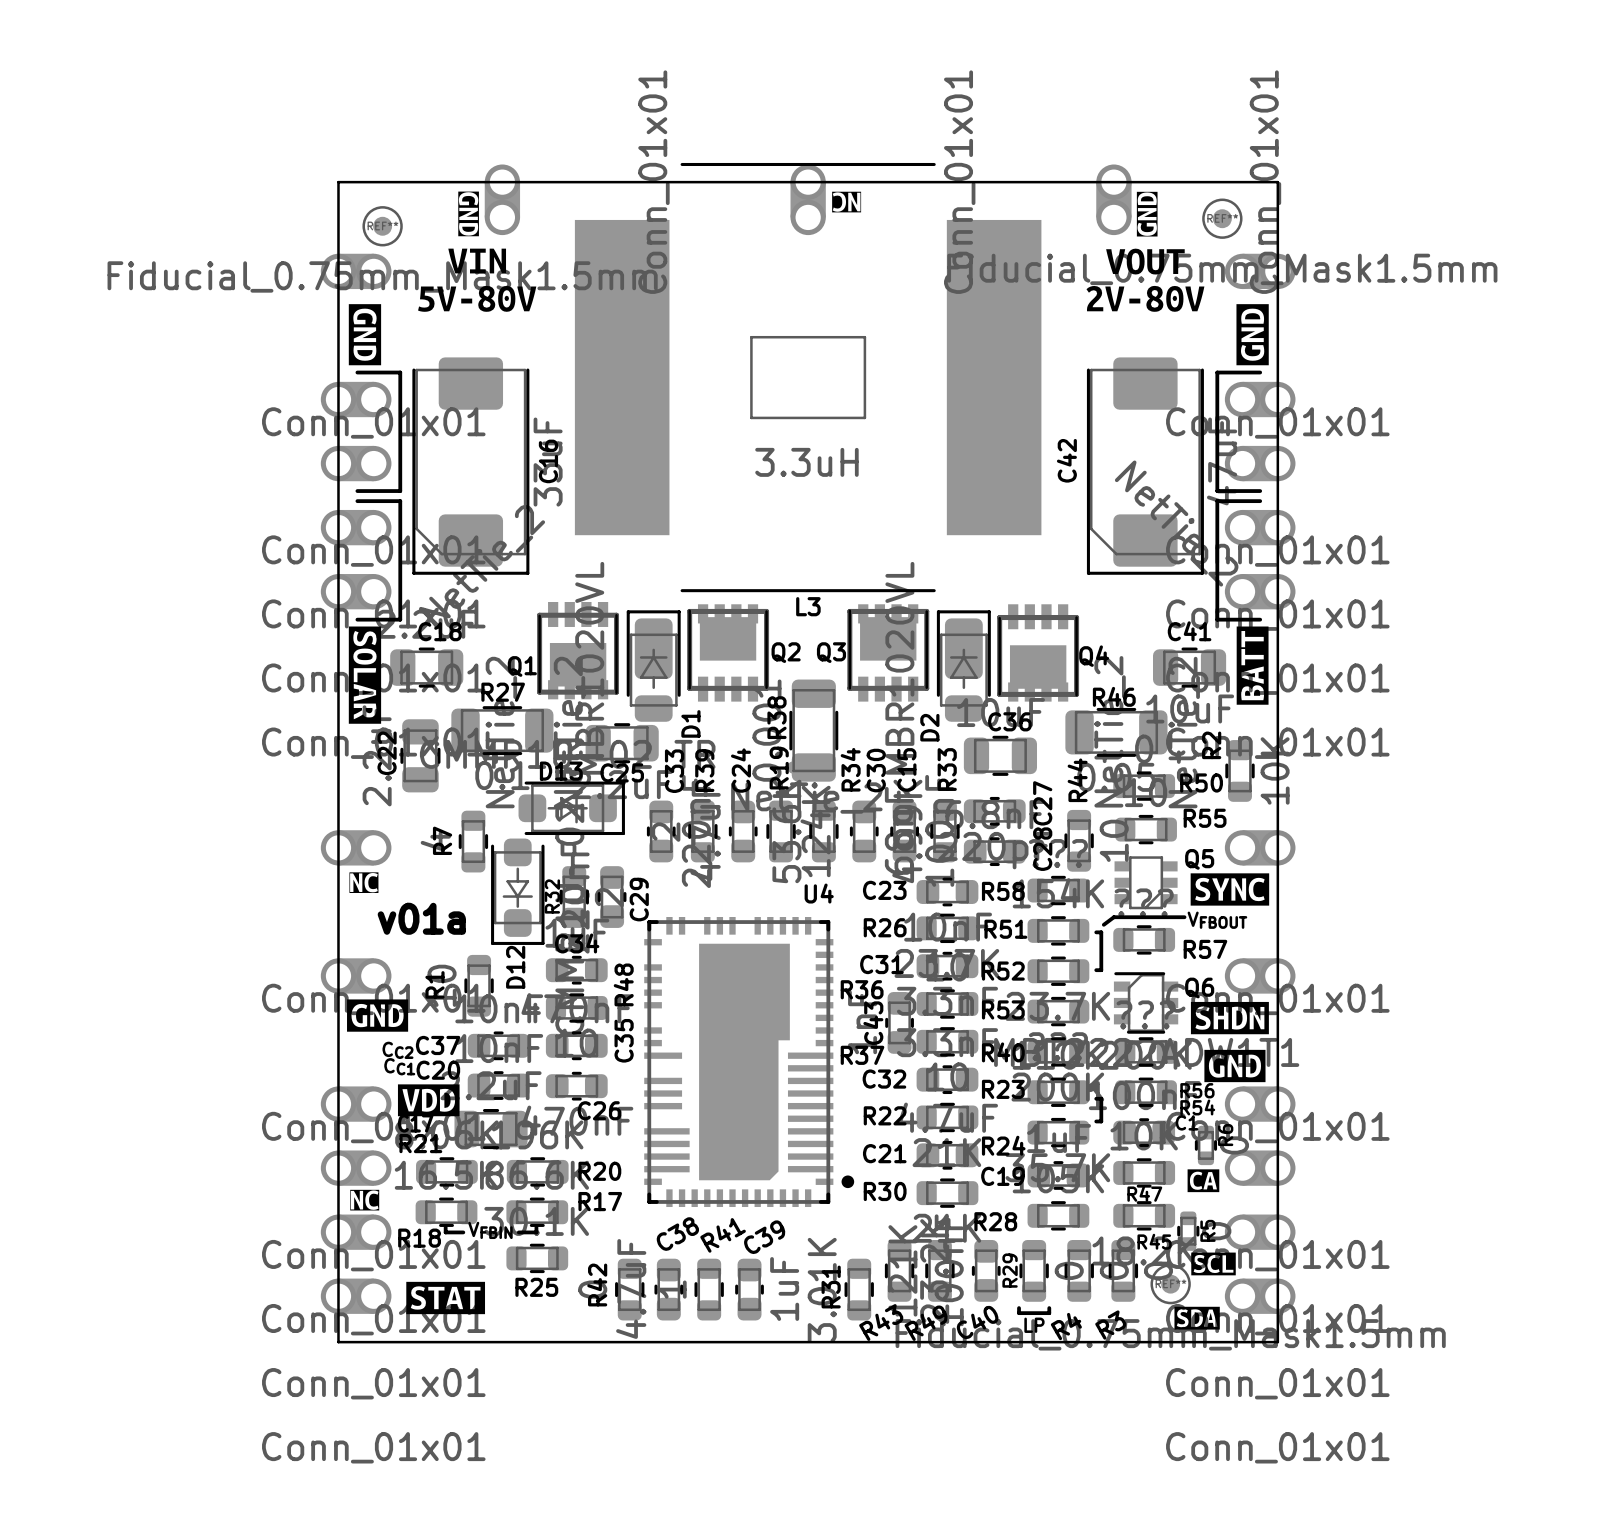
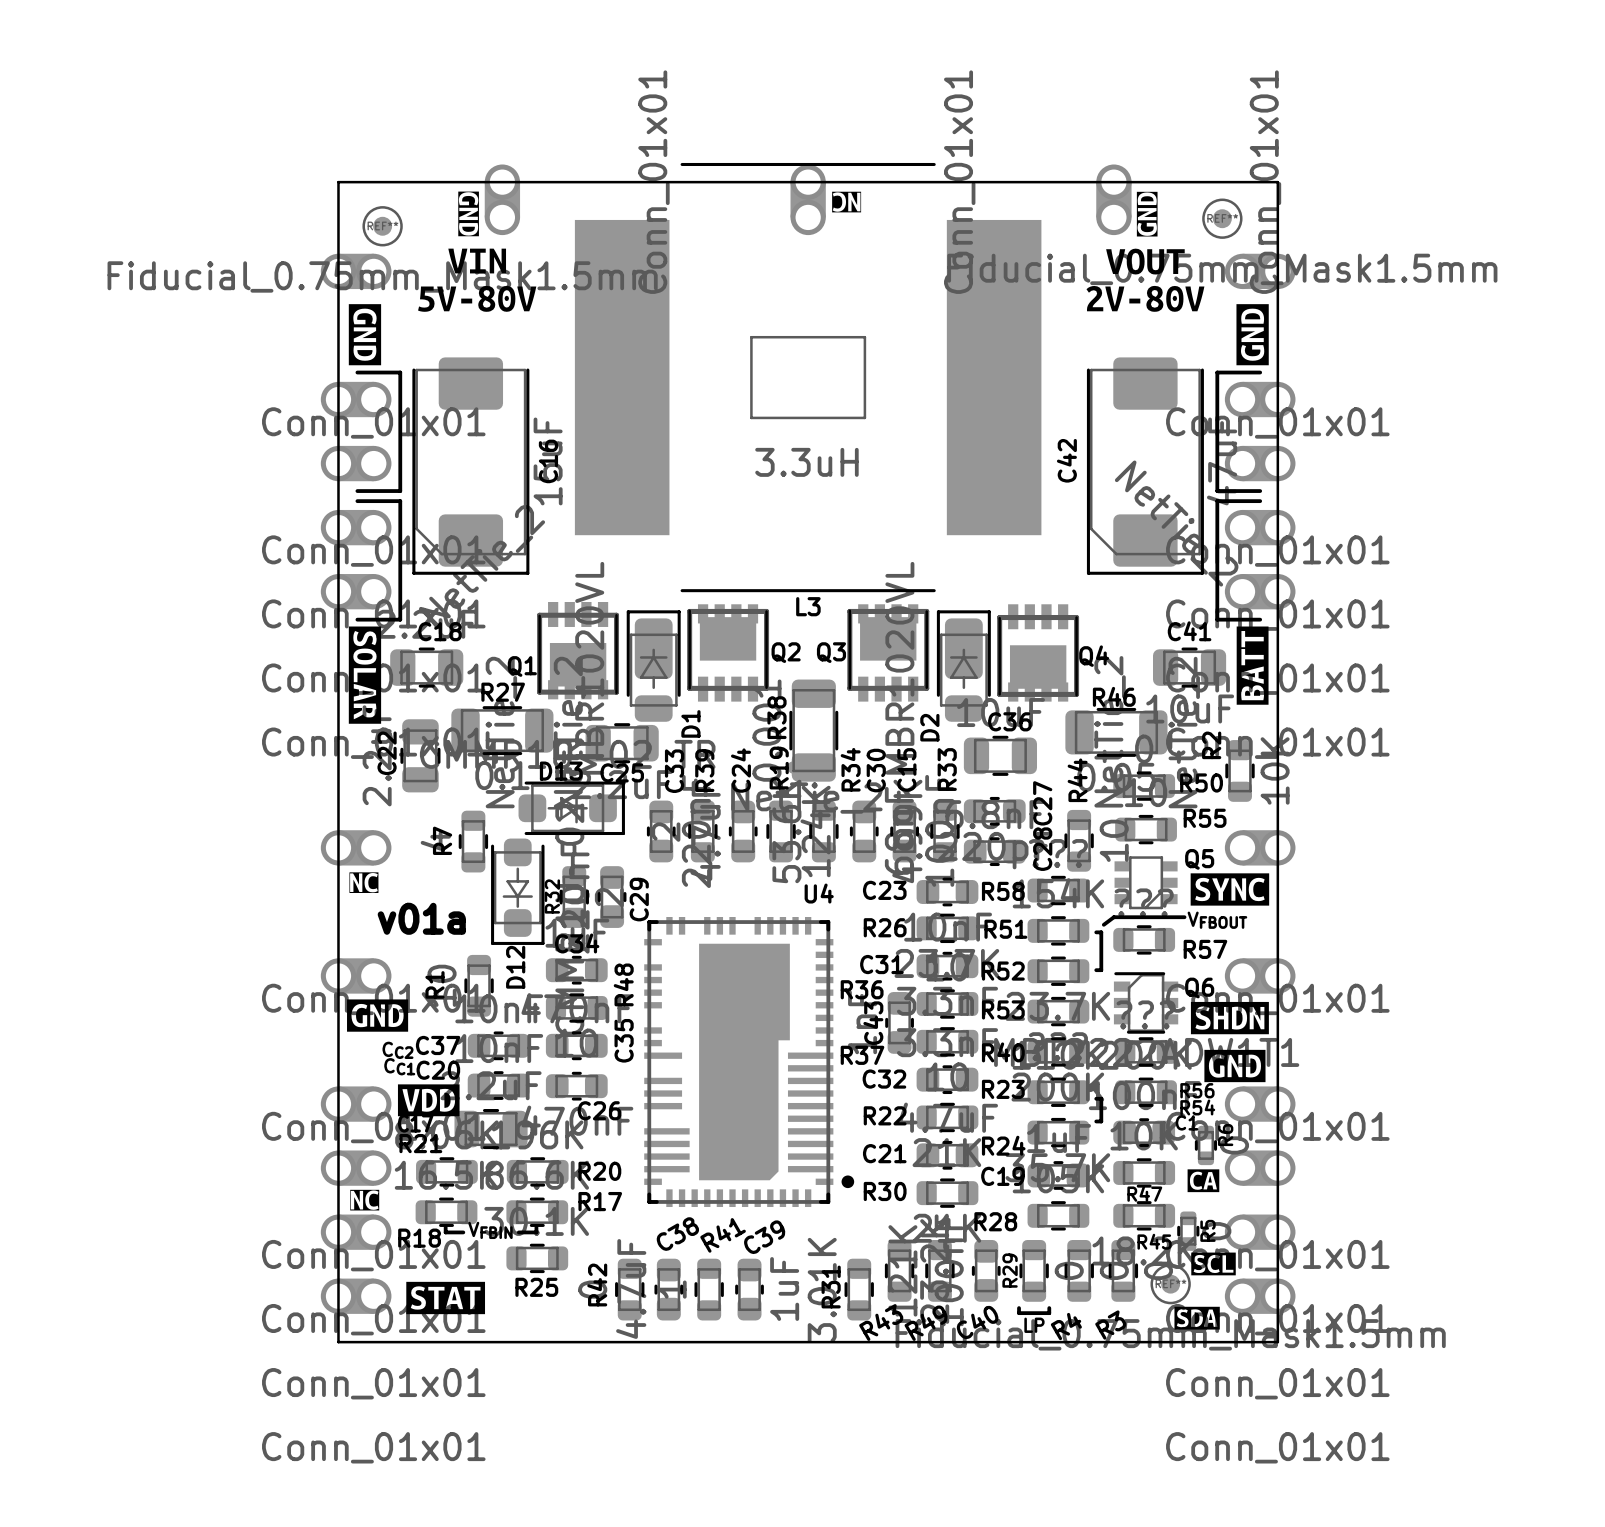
C16 value: 33uF (548, 462) -> 15uF (548, 461)

